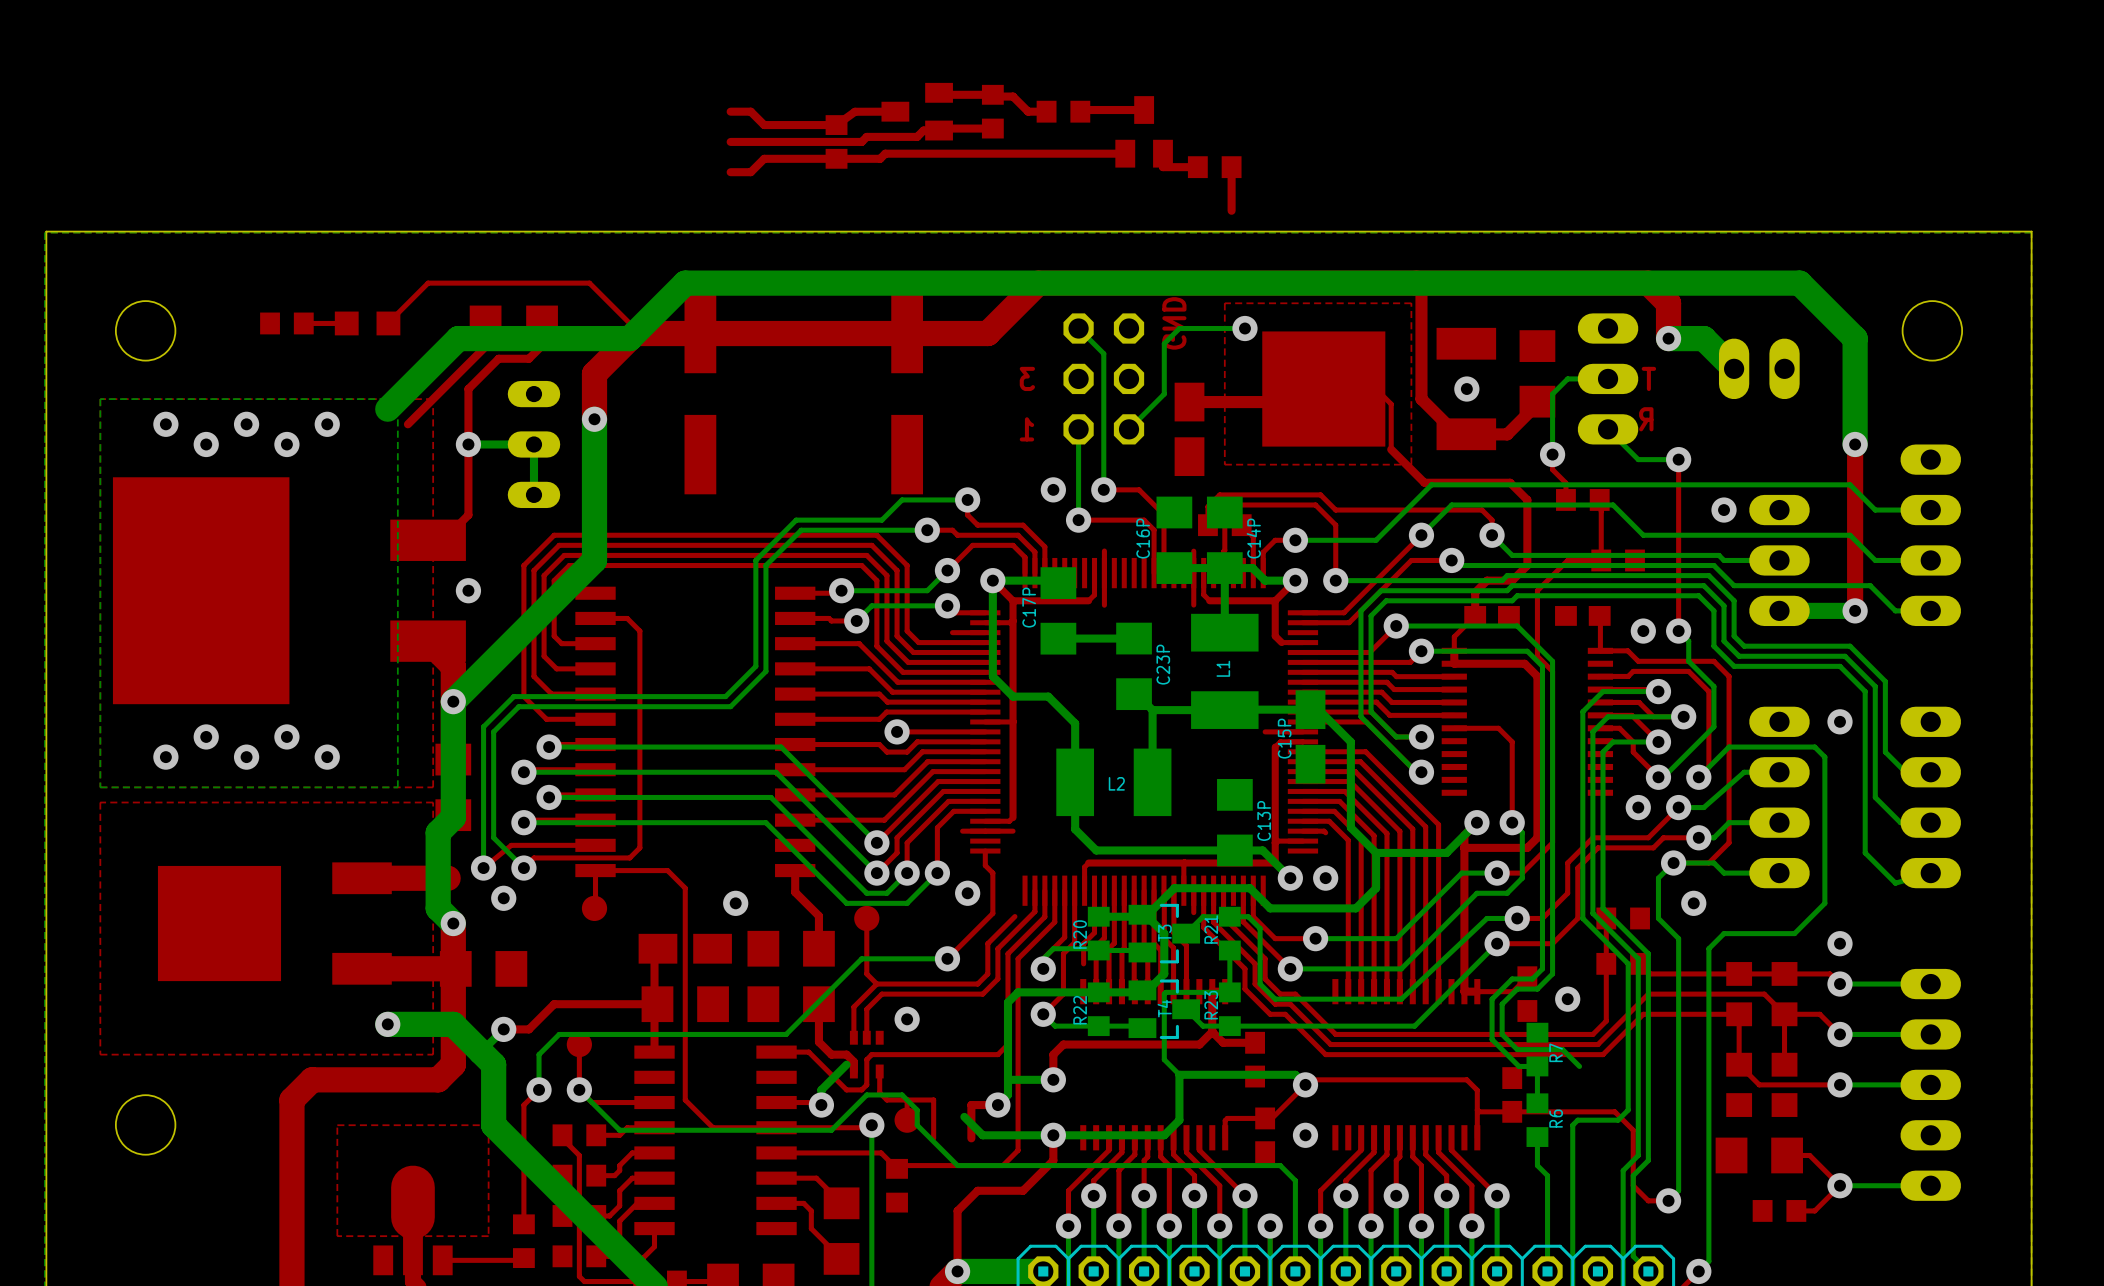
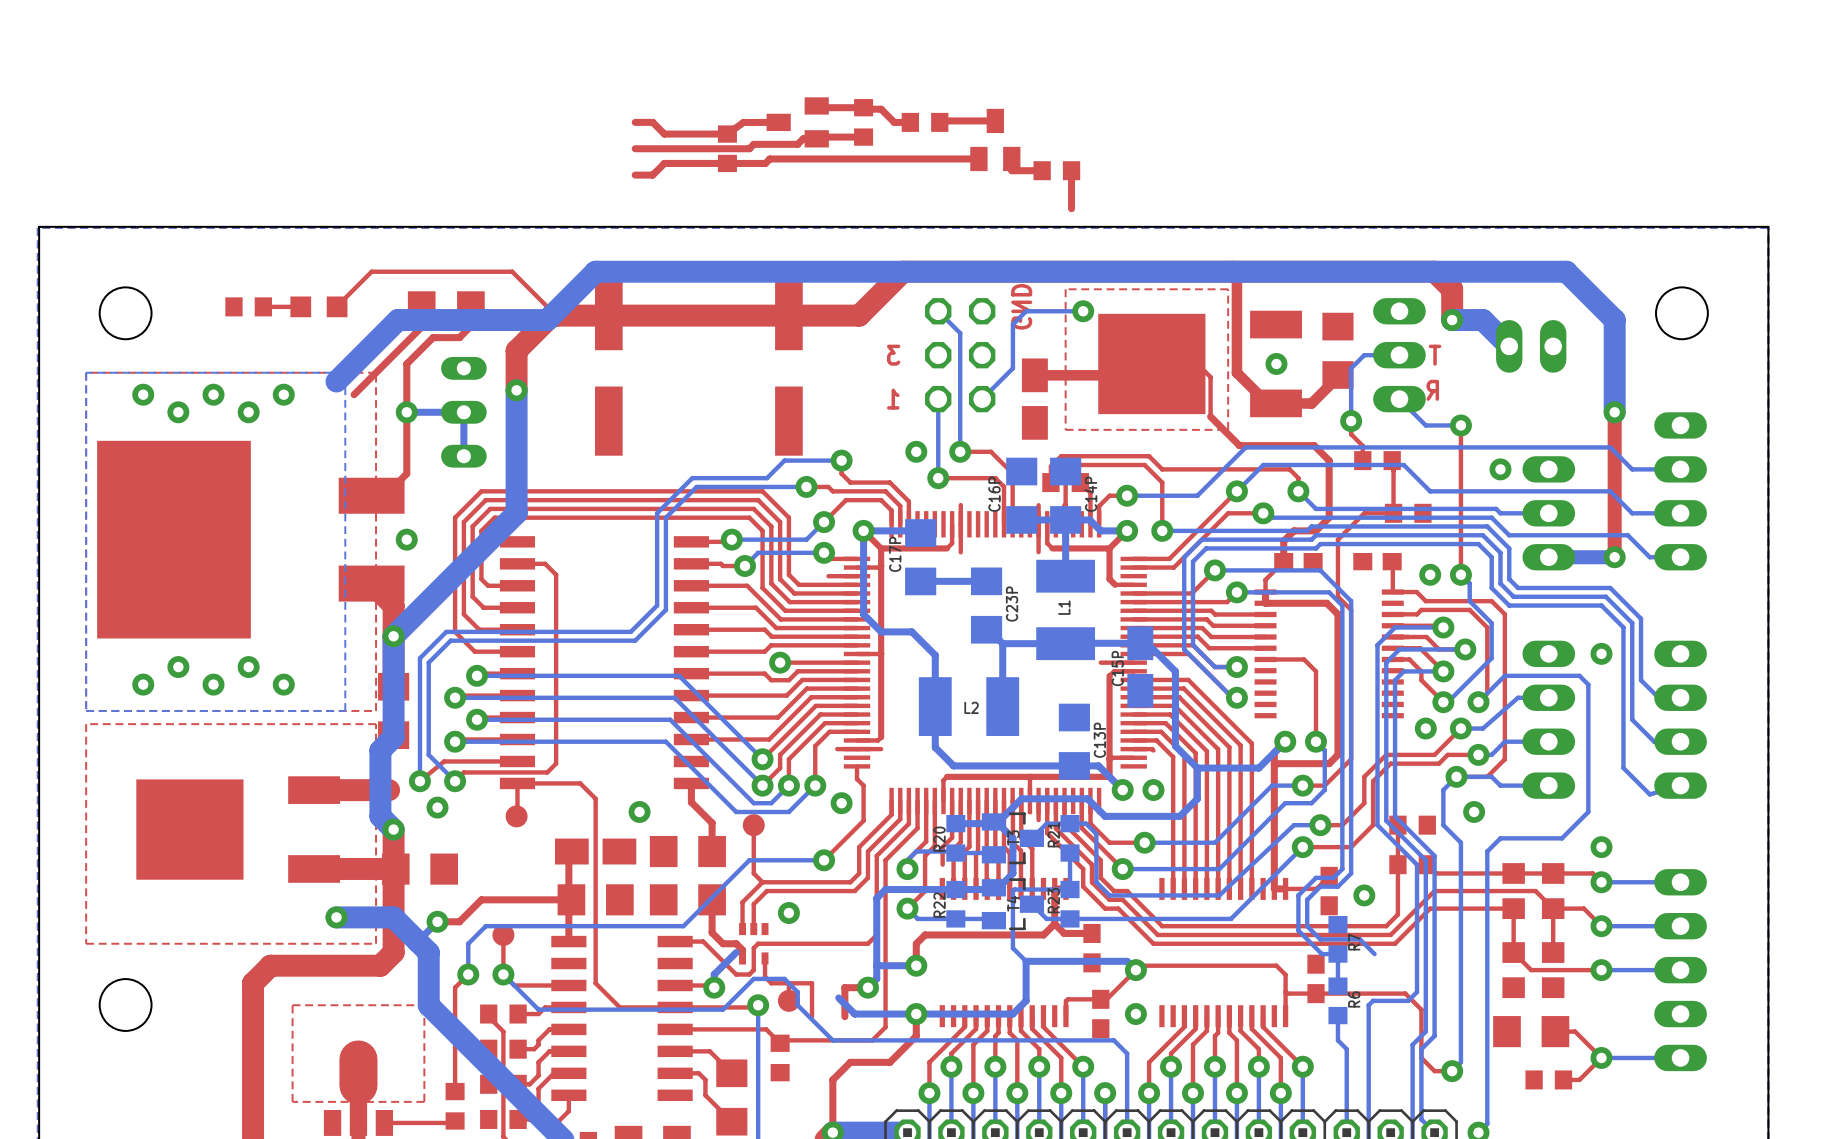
top track: none -> (891, 800) (891, 814) (882, 823)

